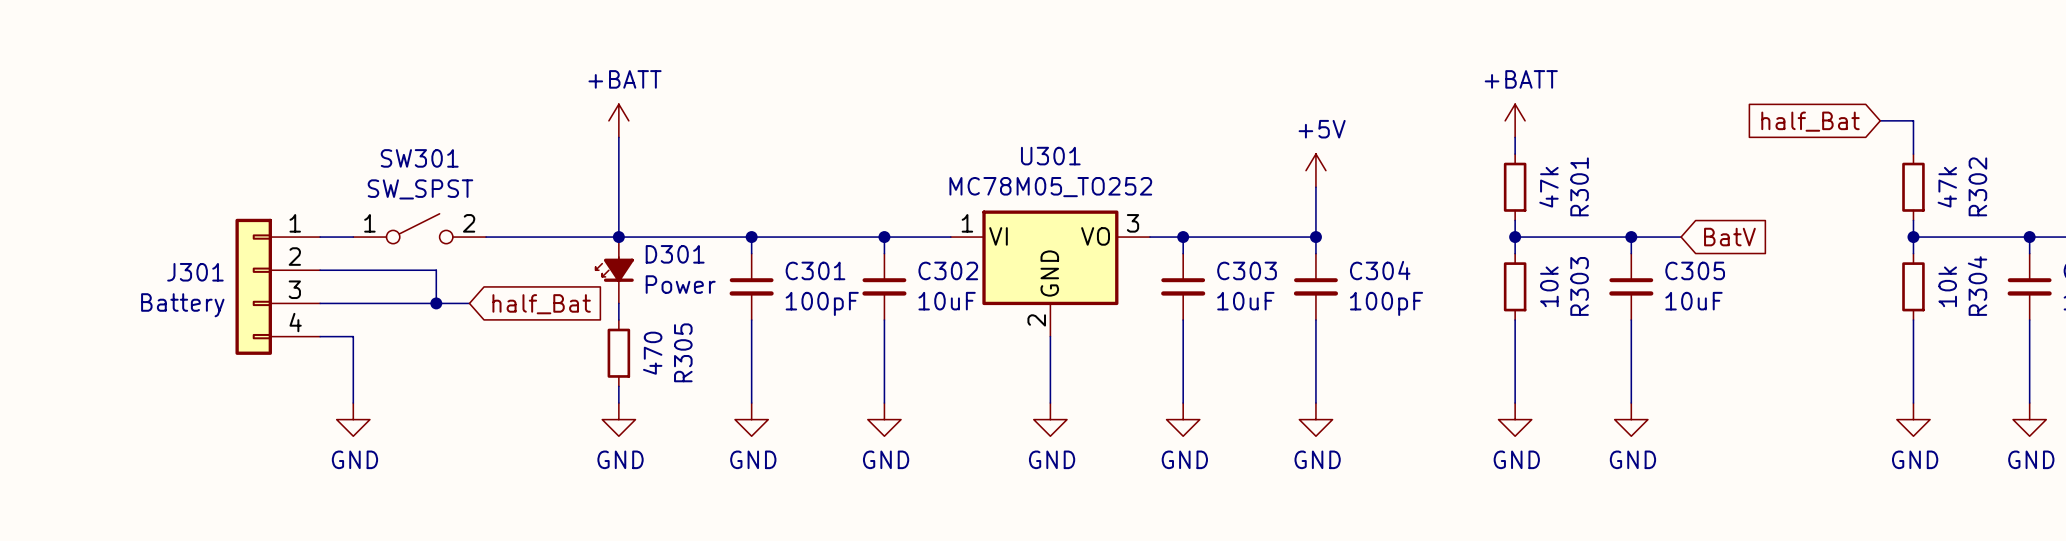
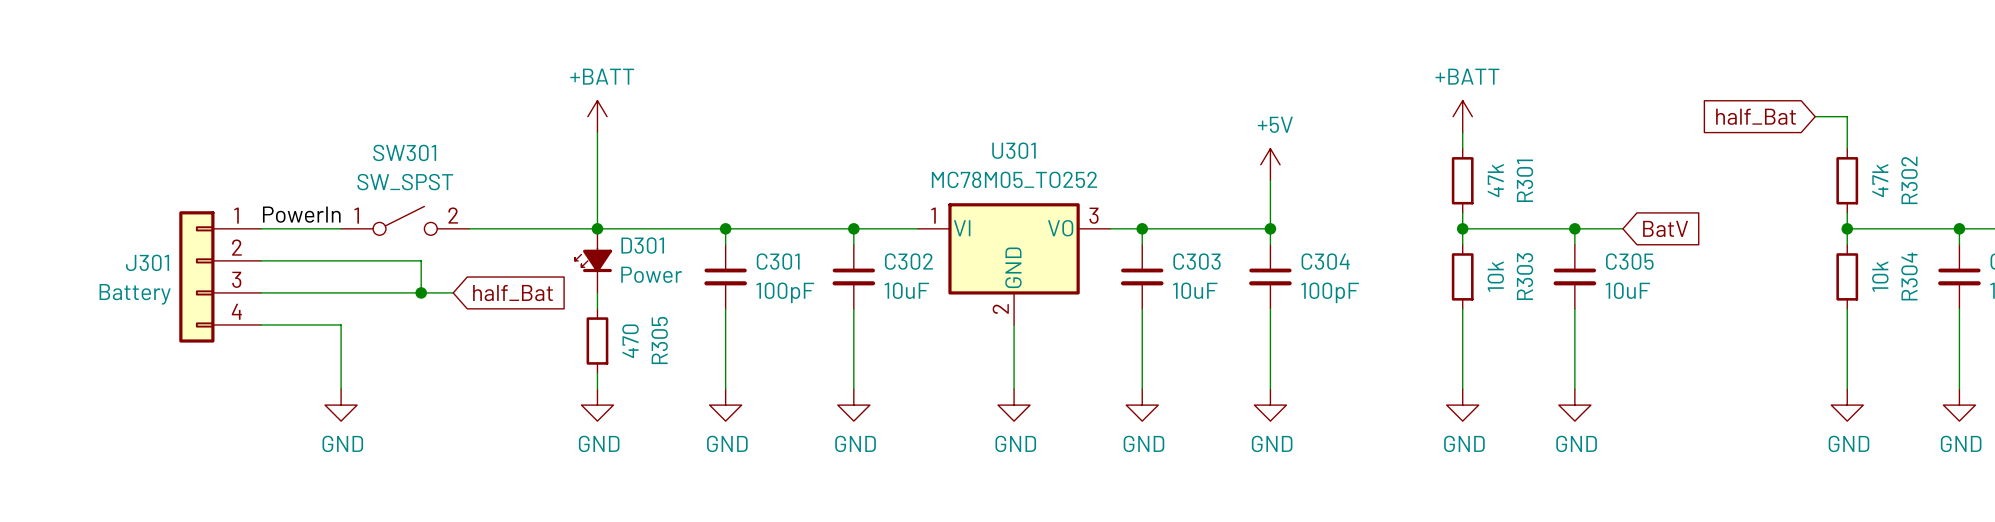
label: none -> PowerIn (301, 214)
J301 position: (277, 286) -> (220, 276)

